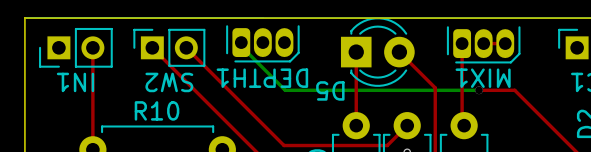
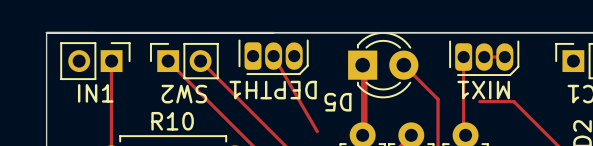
bottom track: (241, 42) (241, 46) (285, 90) (479, 90) -> none
top track: none -> (273, 56) (317, 131)
IN1 rotation: 0° (75, 47) -> 180° (95, 61)
top track: none -> (362, 65) (365, 68) (365, 131)
via: (479, 90) -> none

